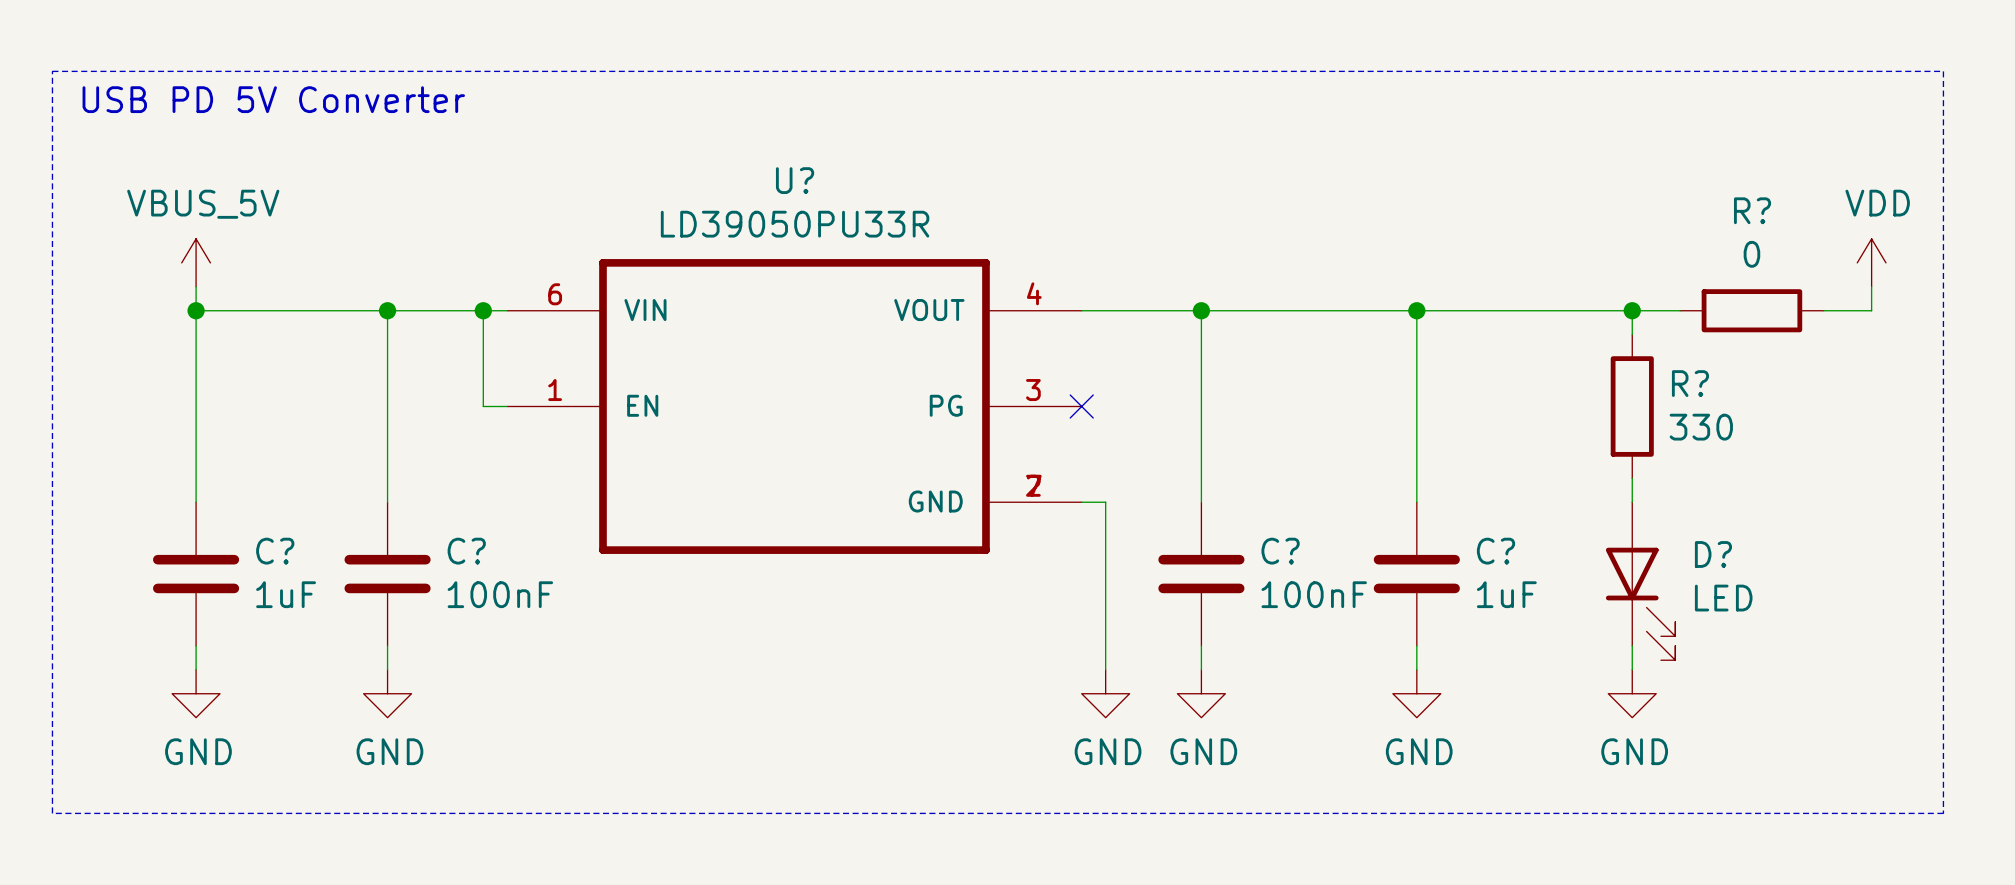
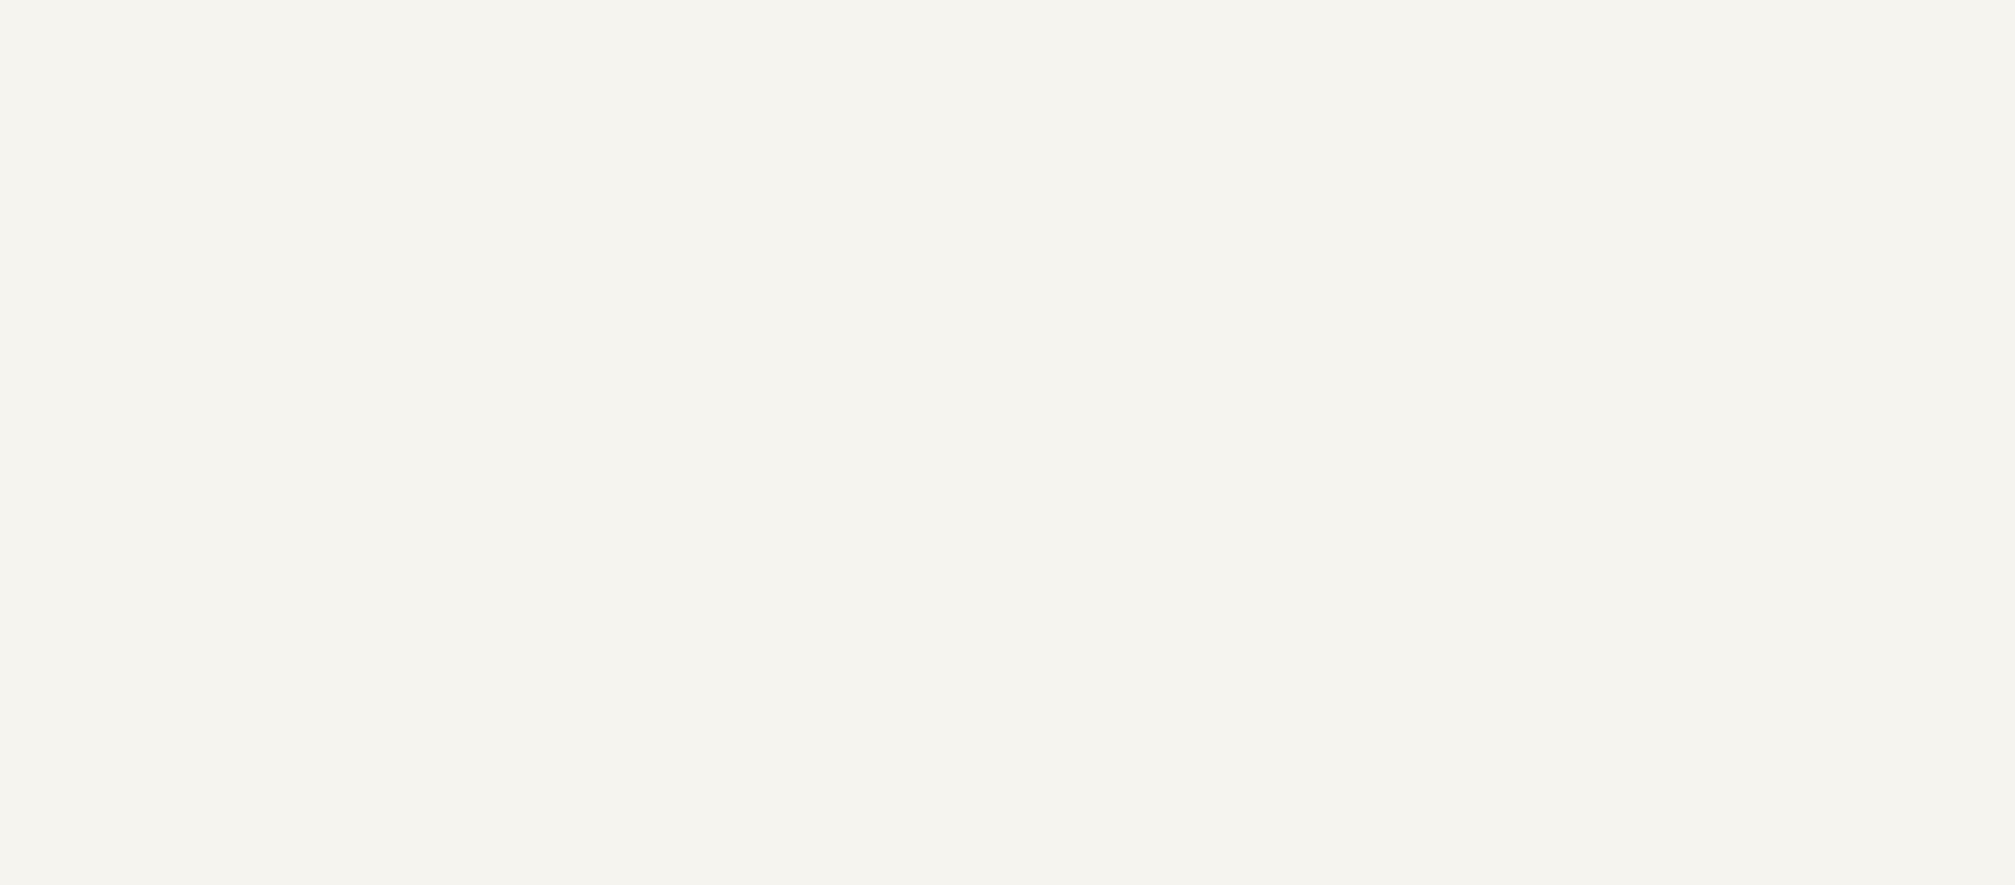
line: (52, 71) (52, 813) (1943, 813) (1943, 71) (52, 71) -> none
text: USB PD 5V Converter (273, 99) -> none
power symbol: VBUS_5V (196, 262) -> none
power symbol: VDD (1871, 262) -> none
wire: (196, 286) (196, 502) -> none
wire: (1871, 286) (1871, 310) (1823, 310) -> none
wire: (196, 310) (507, 310) -> none
junction: (196, 310) -> none
wire: (387, 310) (387, 502) -> none
junction: (387, 310) -> none
wire: (483, 310) (483, 406) (507, 406) -> none
junction: (483, 310) -> none
wire: (1081, 310) (1680, 310) -> none
wire: (1201, 310) (1201, 502) -> none
junction: (1201, 310) -> none
wire: (1416, 310) (1416, 502) -> none
junction: (1416, 310) -> none
wire: (1632, 310) (1632, 334) -> none
junction: (1632, 310) -> none
R?: 0 (1751, 310) -> none
U?: LD39050PU33R (794, 406) -> none
no-connect mark: (1081, 406) -> none
R?: 330 (1632, 406) -> none
wire: (1632, 478) (1632, 502) -> none
wire: (1081, 502) (1105, 502) (1105, 669) -> none
C?: 1uF (196, 574) -> none
C?: 100nF (387, 574) -> none
C?: 100nF (1201, 574) -> none
C?: 1uF (1416, 574) -> none
D?: LED (1640, 581) -> none
wire: (196, 645) (196, 669) -> none
wire: (387, 645) (387, 669) -> none
wire: (1201, 645) (1201, 669) -> none
wire: (1416, 645) (1416, 669) -> none
wire: (1632, 645) (1632, 669) -> none
power symbol: GND (196, 693) -> none
power symbol: GND (387, 693) -> none
power symbol: GND (1105, 693) -> none
power symbol: GND (1201, 693) -> none
power symbol: GND (1416, 693) -> none
power symbol: GND (1632, 693) -> none

